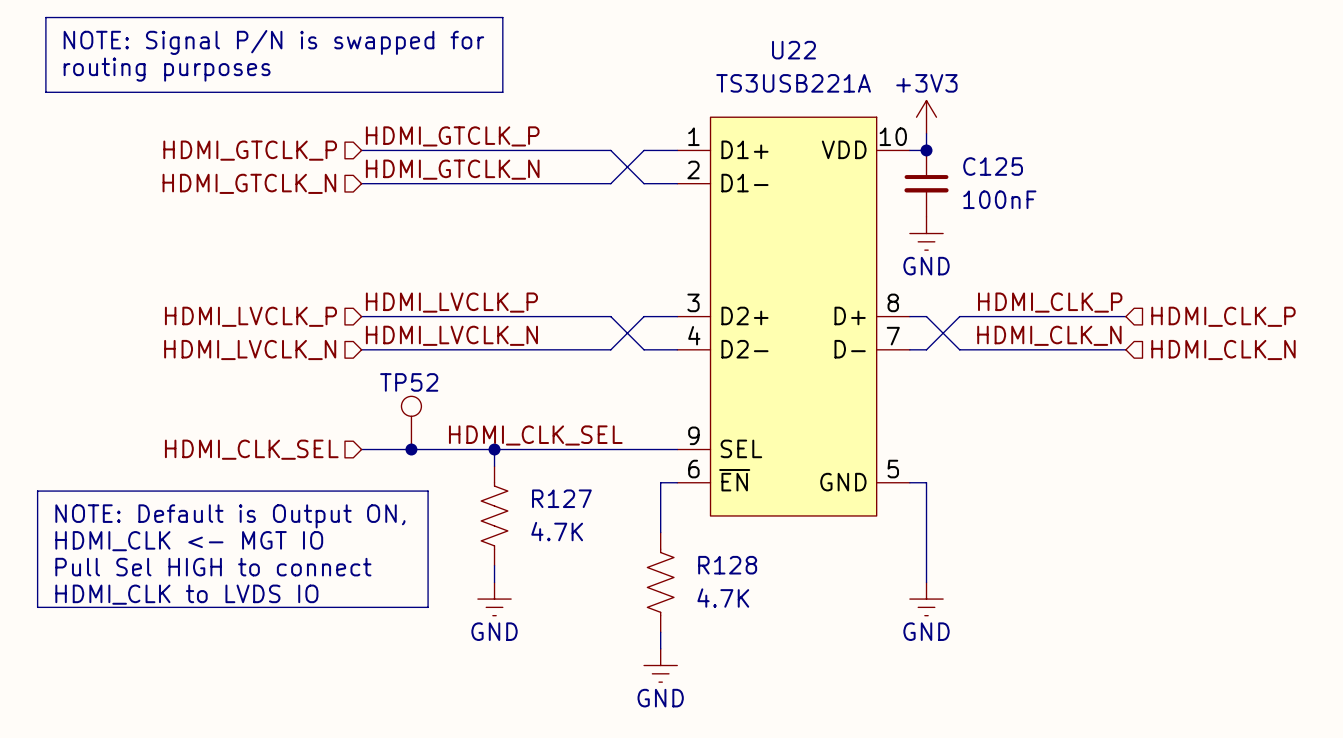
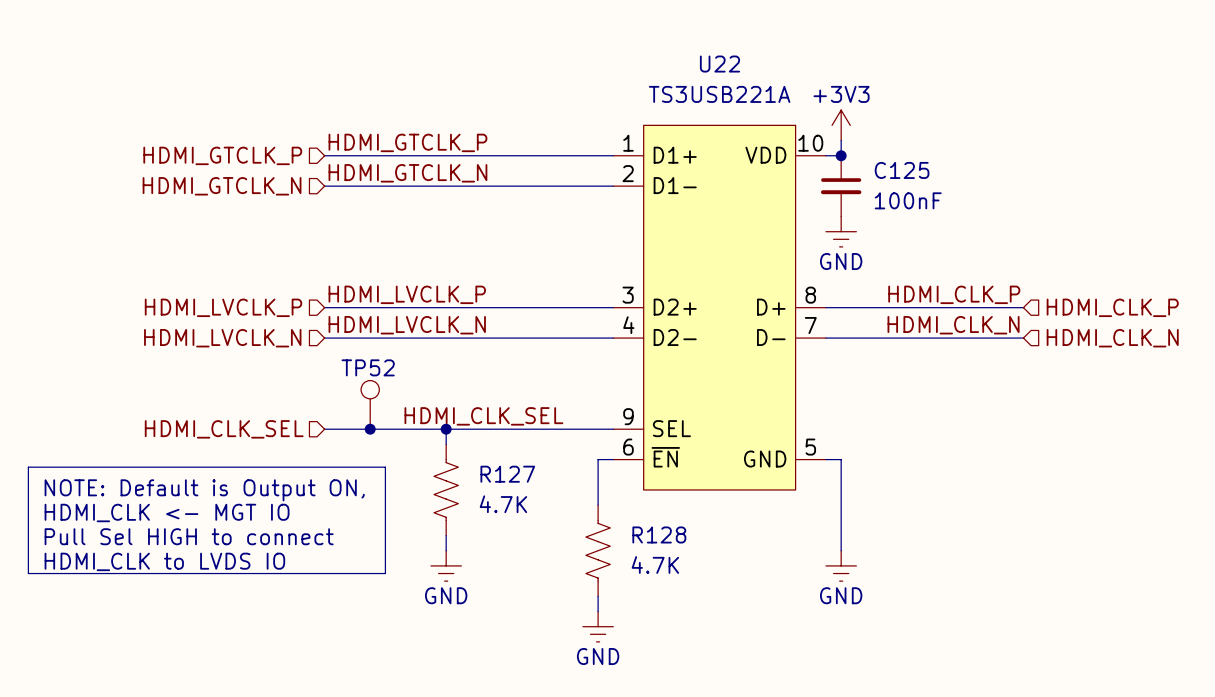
line: (45, 17) (502, 17) (502, 92) (45, 92) (45, 17) -> none
text: NOTE: Signal P/N is swapped for (273, 42) -> none
text: routing purposes (167, 69) -> none
wire: (610, 150) (644, 183) -> (552, 155) (582, 155)
wire: (644, 150) (610, 183) -> (582, 186) (552, 186)
wire: (610, 316) (644, 349) -> (552, 307) (582, 307)
wire: (644, 316) (610, 349) -> (582, 338) (552, 338)
wire: (926, 316) (959, 349) -> (841, 307) (871, 307)
wire: (959, 316) (926, 349) -> (871, 338) (841, 338)

